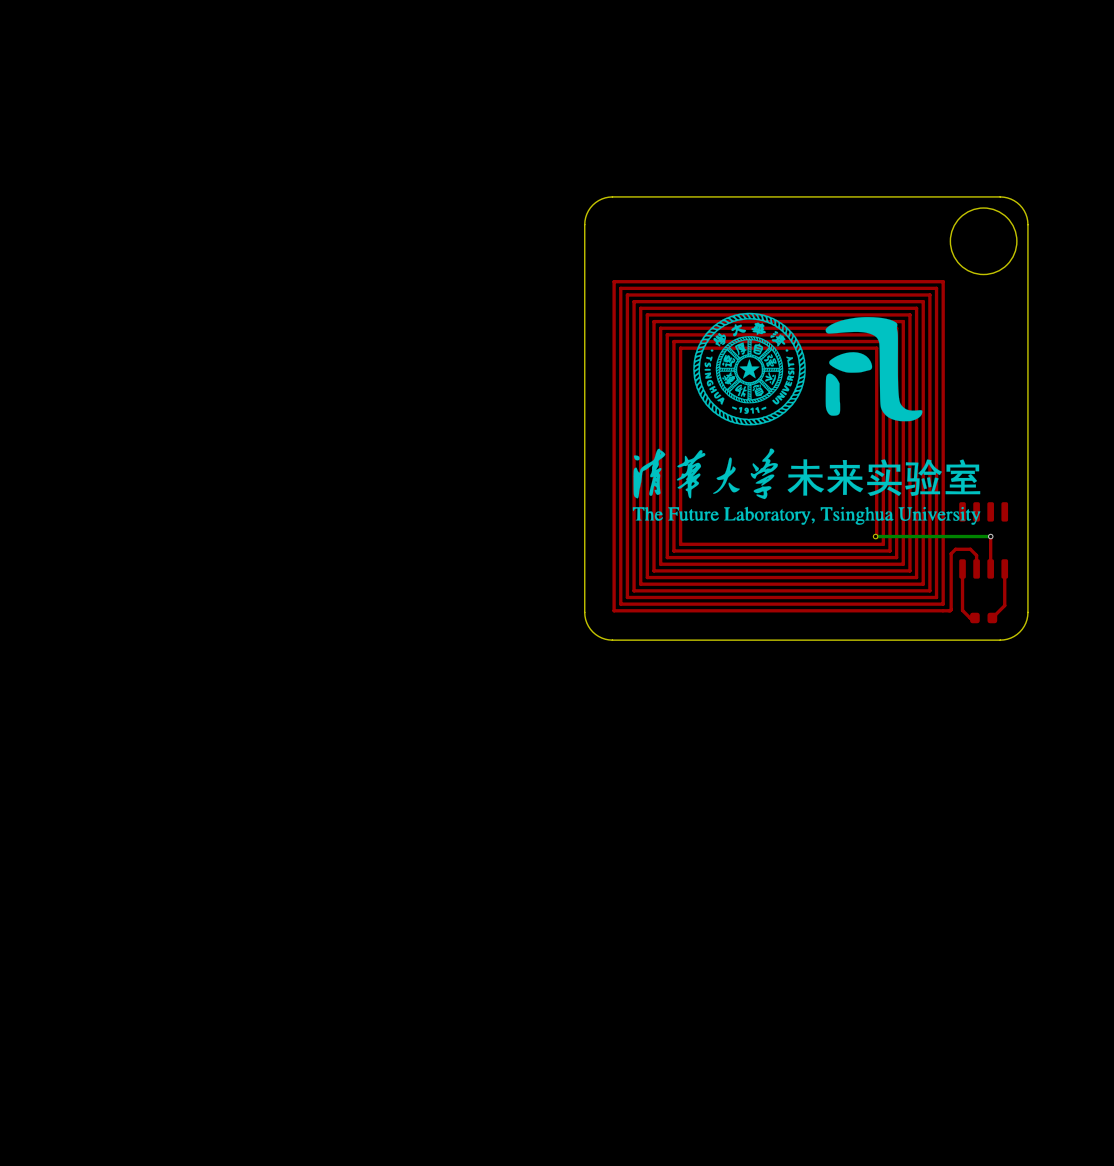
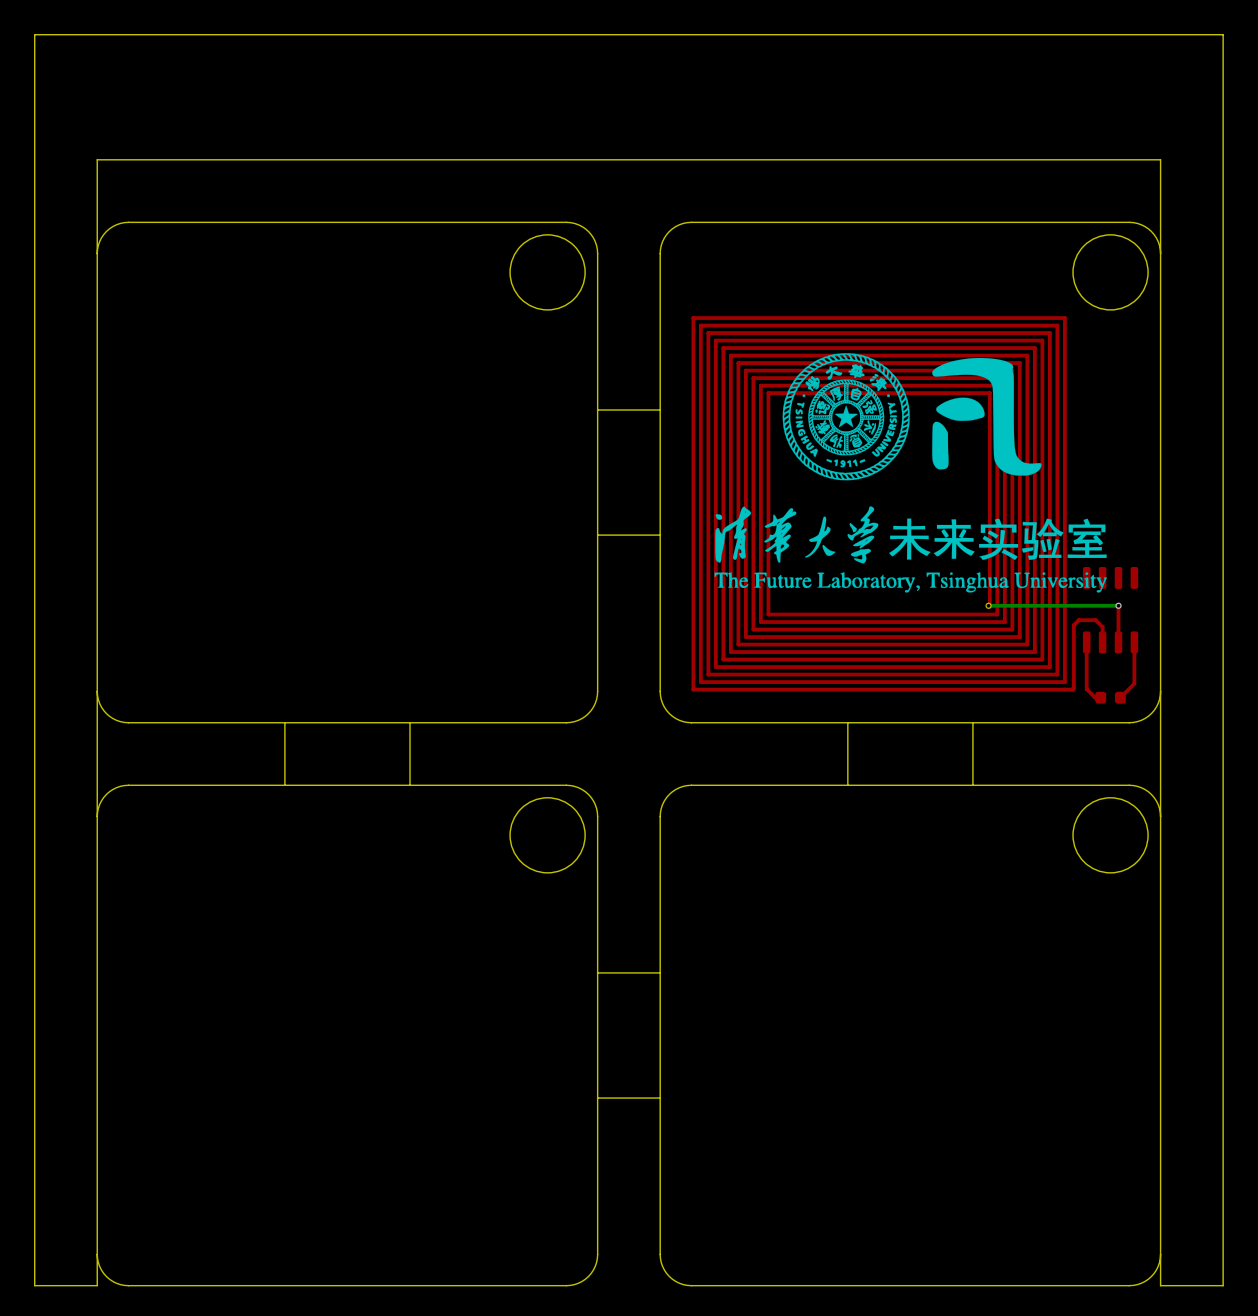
round board edge: none -> [509, 234, 586, 311]
board edge: none -> (97, 253) (99, 241) (106, 231) (116, 224) (128, 222) (570, 222) (582, 226) (591, 234) (596, 245) (597, 253) (597, 691) (593, 707) (585, 716) (578, 720) (566, 722) (128, 722) (116, 720) (106, 713) (99, 703) (97, 691)
board edge: none -> (1160, 253) (1160, 159) (97, 159) (97, 1285) (34, 1285) (34, 34) (1223, 34) (1223, 1285) (1160, 1285) (1160, 691)
board edge: none -> (660, 409) (597, 409)
board edge: none -> (660, 535) (597, 535)
board edge: none -> (284, 722) (284, 785)
board edge: none -> (409, 722) (409, 785)
board edge: none -> (847, 722) (847, 785)
board edge: none -> (972, 722) (972, 785)
round board edge: none -> [509, 797, 586, 874]
round board edge: none -> [1072, 797, 1149, 874]
board edge: none -> (97, 816) (99, 804) (106, 794) (116, 787) (128, 785) (570, 785) (582, 789) (591, 797) (596, 808) (597, 816) (597, 1254) (593, 1270) (585, 1279) (574, 1284) (566, 1285) (128, 1285) (116, 1283) (106, 1276) (99, 1266) (97, 1254)
board edge: none -> (1160, 816) (1158, 804) (1151, 794) (1141, 787) (1129, 785) (687, 785) (679, 787) (669, 794) (662, 804) (660, 816) (660, 1254) (664, 1270) (672, 1279) (683, 1284) (691, 1285) (1129, 1285) (1141, 1283) (1151, 1276) (1158, 1266) (1160, 1254)
board edge: none -> (660, 972) (597, 972)
board edge: none -> (660, 1098) (597, 1098)

